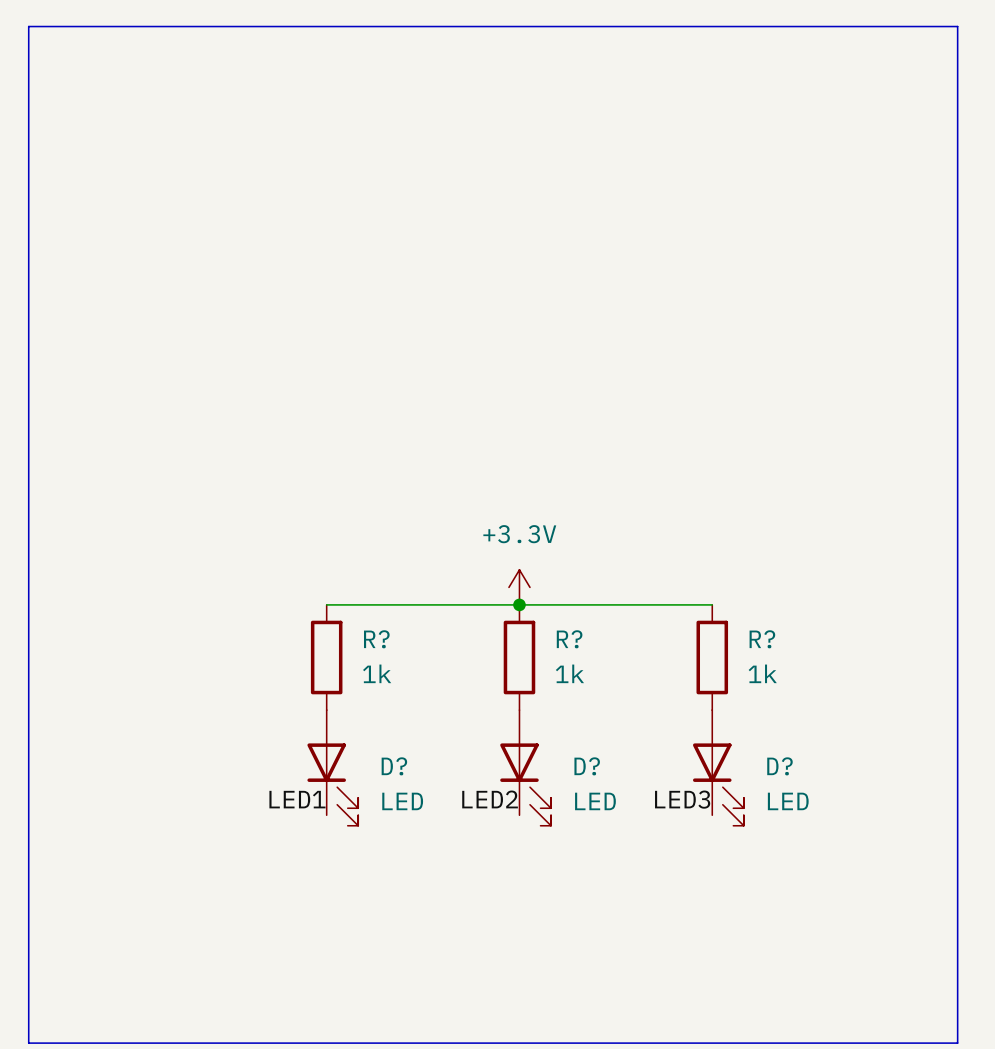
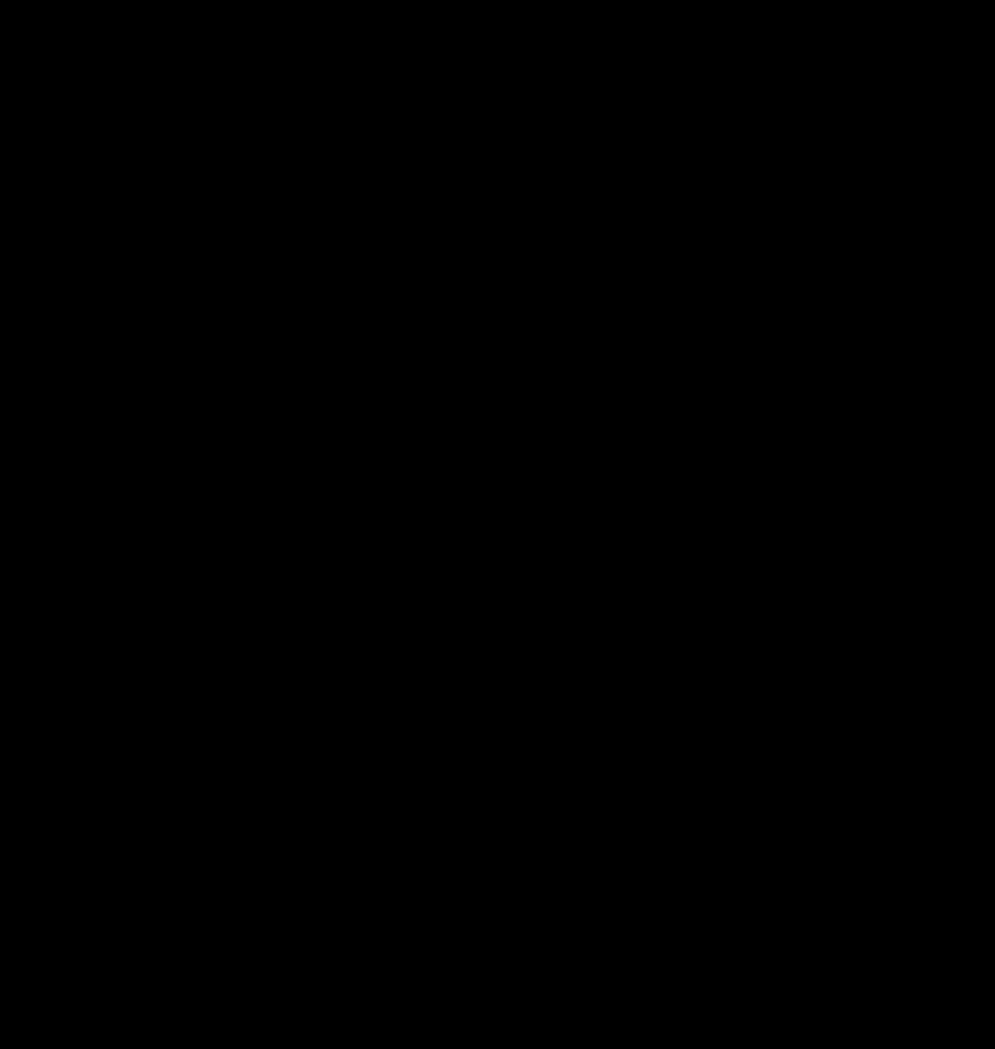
line: (28, 26) (957, 26) (957, 1043) (28, 1043) (28, 26) -> none
power symbol: +3.3V (519, 587) -> none
wire: (326, 604) (712, 604) -> none
junction: (519, 604) -> none
R?: 1k (326, 657) -> none
R?: 1k (519, 657) -> none
R?: 1k (712, 657) -> none
D?: LED (332, 767) -> none
D?: LED (525, 767) -> none
D?: LED (718, 767) -> none
label: LED1 (297, 799) -> none
label: LED2 (490, 799) -> none
label: LED3 (682, 799) -> none

